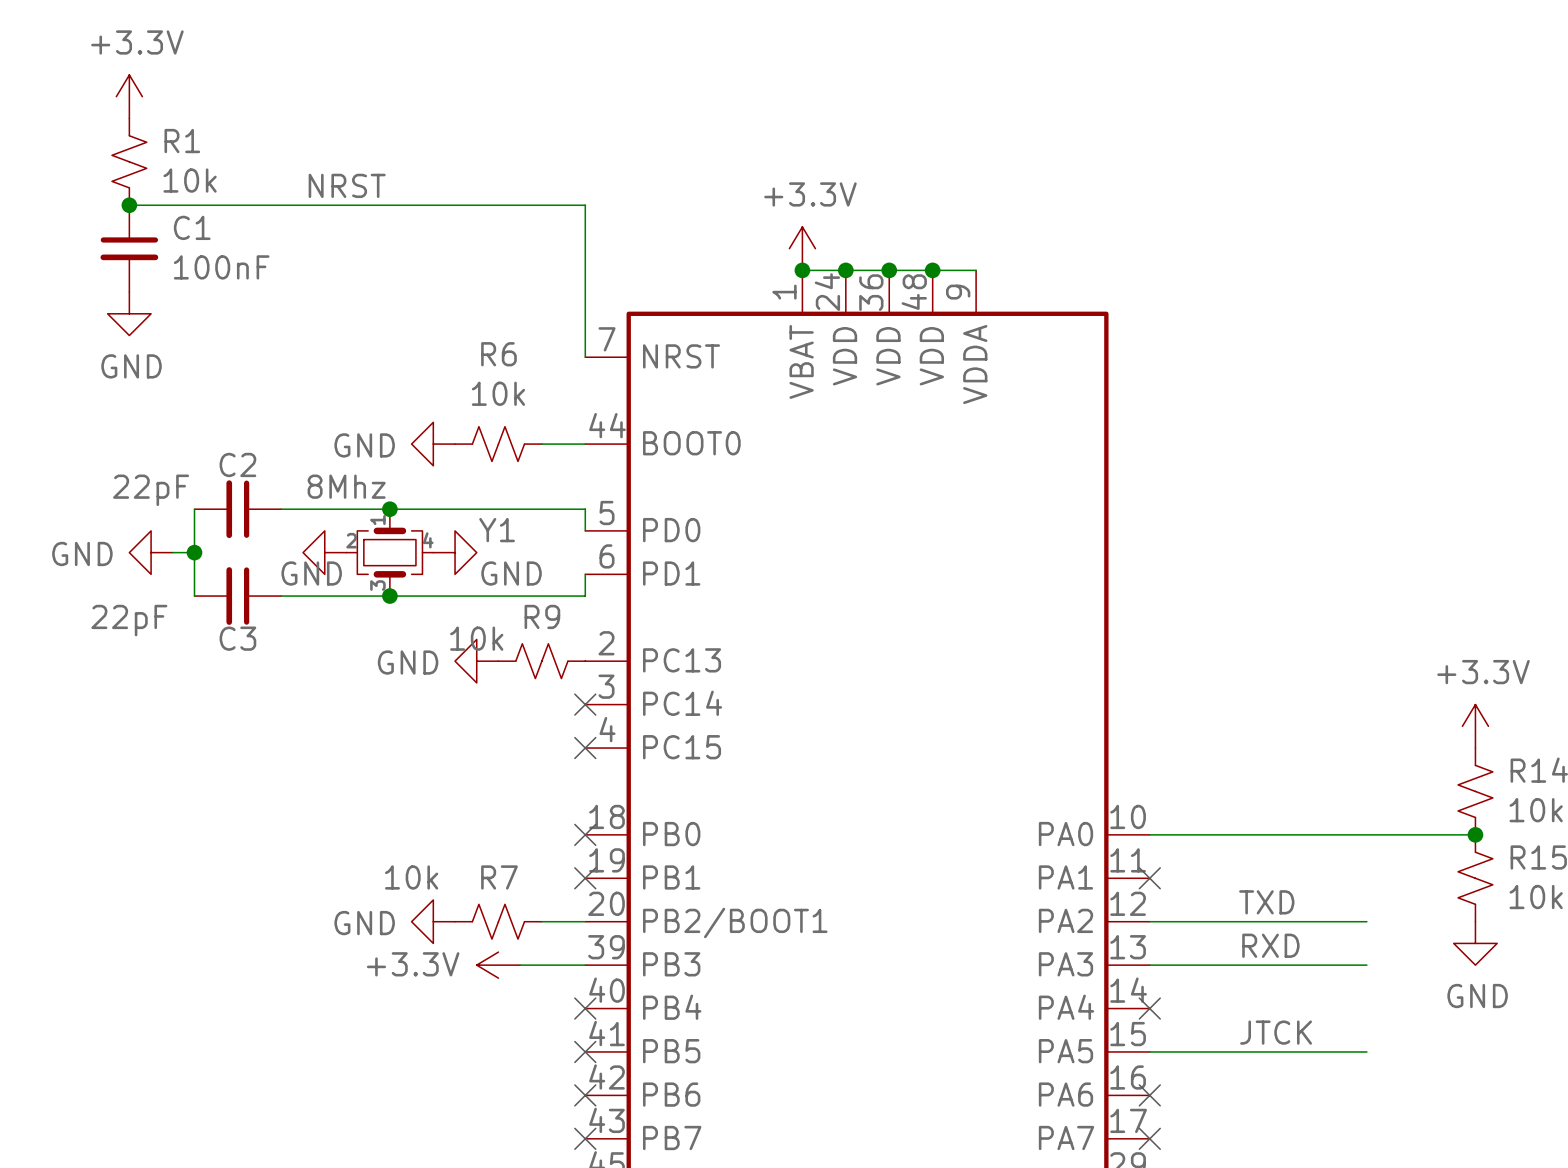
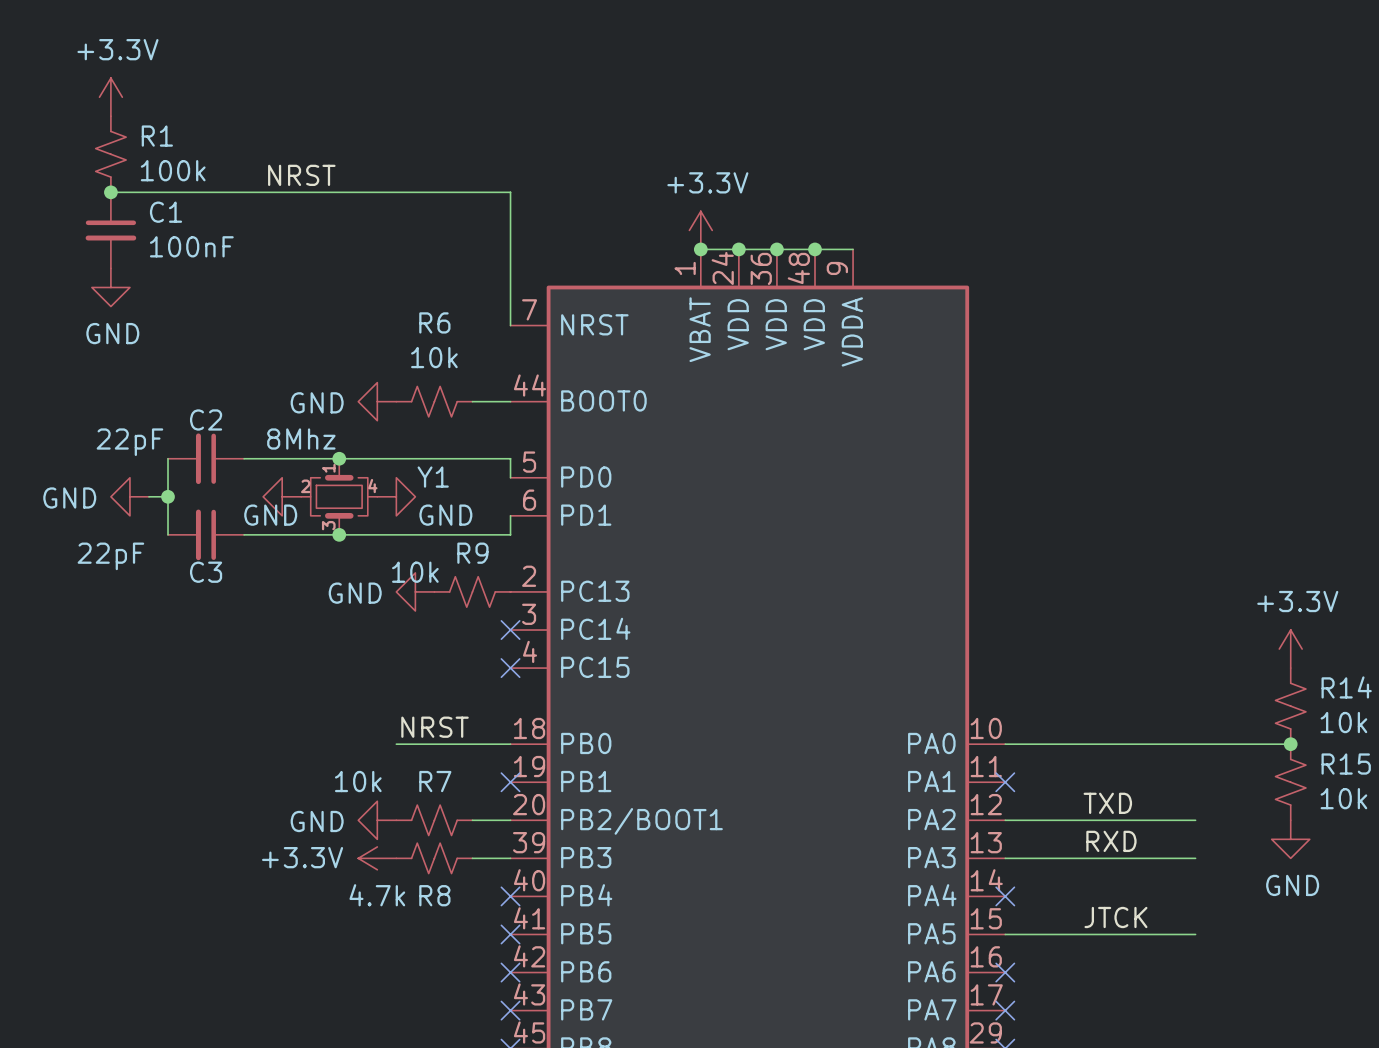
R1 value: 10k (190, 180) -> 100k (173, 170)
label: none -> NRST (435, 727)
wire: none -> (396, 744) (510, 744)
no-connect mark: (585, 834) -> none
R8: none -> 4.7k (434, 858)
power symbol position: +3.3V (498, 965) -> +3.3V (377, 858)

